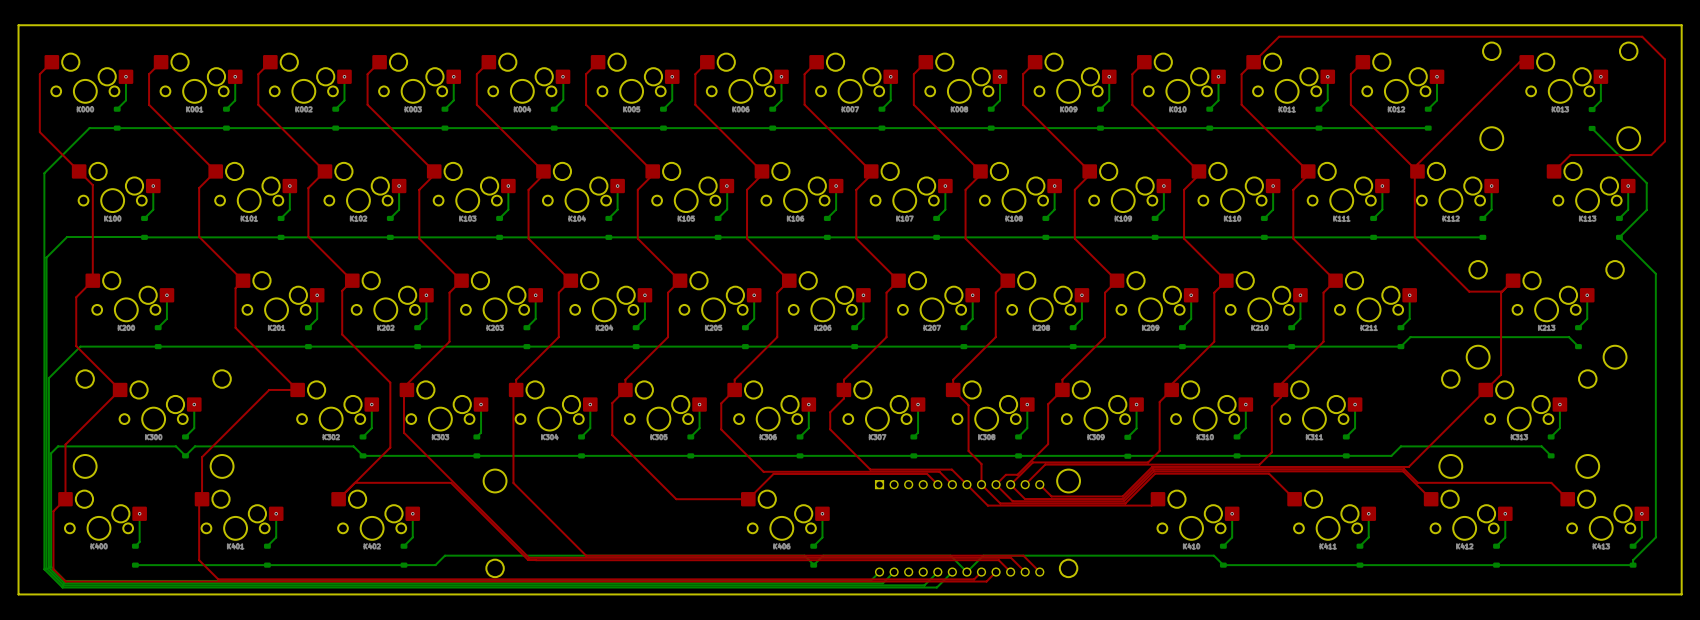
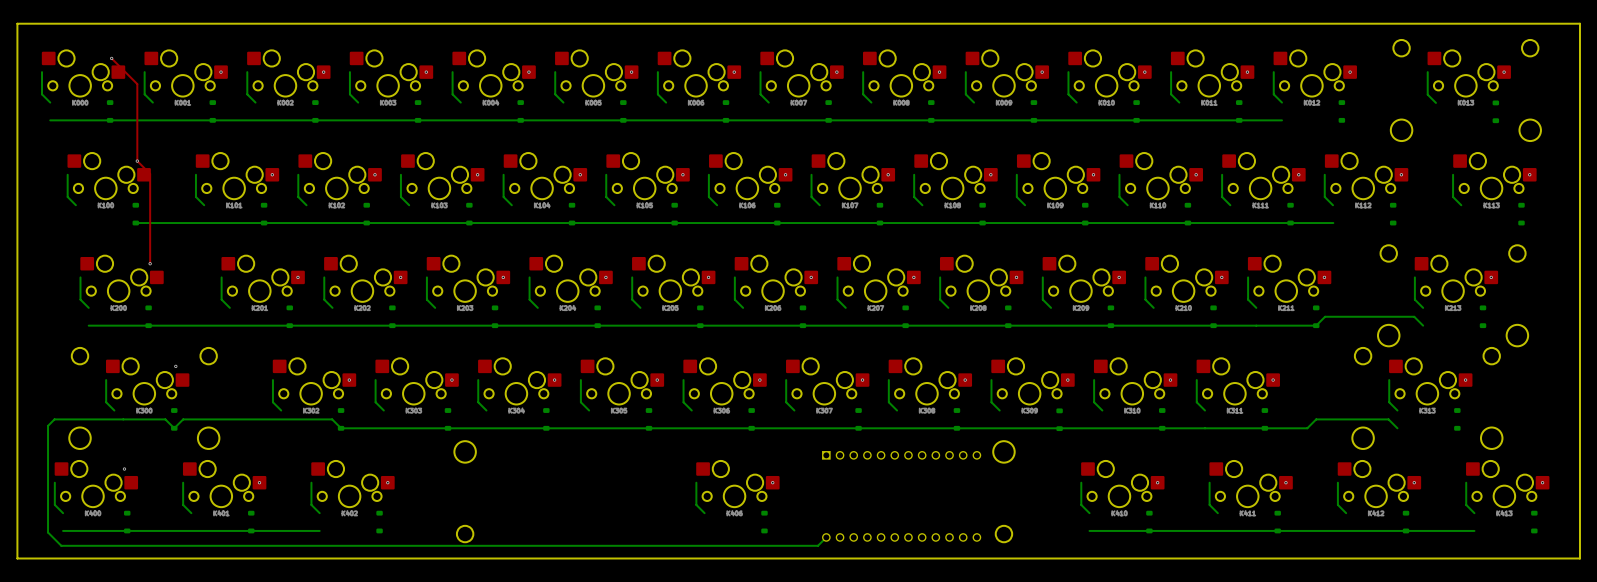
top track: (51, 62) (39, 74) (39, 132) (92, 185) (92, 280) (76, 297) (76, 346) (120, 389) (65, 444) (65, 499) (53, 511) (53, 569) (65, 581) (986, 581) (996, 572) -> none
top track: none -> (111, 58) (137, 84) (137, 161) (150, 173) (150, 263)
top track: (161, 62) (149, 74) (149, 104) (215, 171) (199, 188) (199, 236) (243, 280) (235, 288) (235, 327) (297, 389) (269, 389) (202, 457) (202, 499) -> none
top track: (270, 62) (258, 74) (258, 104) (324, 171) (308, 188) (308, 236) (352, 280) (342, 290) (342, 334) (390, 382) (390, 447) (338, 499) -> none
top track: (379, 62) (367, 74) (367, 104) (434, 171) -> none
top track: (488, 62) (476, 74) (476, 104) (543, 171) -> none
top track: (598, 62) (586, 74) (586, 104) (652, 171) -> none
top track: (707, 62) (695, 74) (695, 104) (761, 171) -> none
top track: (816, 62) (804, 74) (804, 104) (871, 171) -> none
top track: (925, 62) (913, 74) (913, 104) (980, 171) -> none
top track: (1035, 62) (1023, 74) (1023, 104) (1089, 171) -> none
top track: (1144, 62) (1132, 74) (1132, 104) (1198, 171) -> none
top track: (1362, 62) (1350, 74) (1350, 104) (1417, 171) (1417, 164) (1519, 62) (1526, 62) -> none
bottom track: none -> (42, 72) (42, 94) (50, 102)
bottom track: (125, 76) (125, 100) (117, 109) -> none
via position: (125, 76) -> (111, 58)
bottom track: none -> (144, 72) (144, 94) (152, 102)
bottom track: (235, 76) (235, 100) (226, 109) -> none
bottom track: none -> (247, 72) (247, 94) (255, 102)
bottom track: (344, 76) (344, 100) (335, 109) -> none
bottom track: none -> (349, 72) (349, 94) (358, 102)
bottom track: (453, 76) (453, 100) (444, 109) -> none
bottom track: none -> (452, 72) (452, 94) (460, 102)
bottom track: none -> (555, 72) (555, 94) (563, 102)
bottom track: (672, 76) (672, 100) (663, 109) -> none
bottom track: none -> (657, 72) (657, 94) (666, 102)
bottom track: (781, 76) (781, 100) (772, 109) -> none
bottom track: none -> (760, 72) (760, 94) (768, 102)
bottom track: (890, 76) (890, 100) (881, 109) -> none
bottom track: none -> (863, 72) (863, 94) (871, 102)
bottom track: (999, 76) (999, 100) (991, 109) -> none
bottom track: none -> (965, 72) (965, 94) (974, 102)
bottom track: (1109, 76) (1109, 100) (1100, 109) -> none
bottom track: none -> (1068, 72) (1068, 94) (1076, 102)
bottom track: (1218, 76) (1218, 100) (1209, 109) -> none
bottom track: none -> (1171, 72) (1171, 94) (1179, 102)
bottom track: (1327, 76) (1327, 100) (1318, 109) -> none
bottom track: none -> (1273, 72) (1273, 94) (1281, 102)
bottom track: (1437, 76) (1437, 100) (1428, 109) -> none
bottom track: none -> (1427, 72) (1427, 94) (1435, 102)
bottom track: (1600, 76) (1600, 100) (1592, 109) -> none
bottom track: (563, 77) (563, 100) (554, 109) -> none
bottom track: (89, 128) (44, 173) (44, 569) (62, 587) (936, 587) (952, 572) -> (84, 120) (50, 120)
bottom track: (1364, 128) (1428, 128) -> none
bottom track: (1592, 128) (1646, 183) (1646, 210) (1619, 237) (1655, 273) (1655, 537) (1633, 560) (1633, 565) (1569, 565) -> none
top track: (1308, 171) (1241, 104) (1241, 74) (1279, 36) (1642, 36) (1664, 59) (1664, 141) (1651, 155) (1570, 155) (1554, 171) -> none
top track: (435, 173) (419, 189) (419, 238) (463, 282) -> none
top track: (545, 173) (528, 189) (528, 238) (572, 282) -> none
top track: (654, 173) (637, 189) (637, 238) (681, 282) -> none
top track: (763, 173) (747, 189) (747, 238) (790, 282) -> none
top track: (872, 173) (856, 189) (856, 238) (900, 282) -> none
top track: (982, 173) (965, 189) (965, 238) (1009, 282) -> none
top track: (1091, 173) (1074, 189) (1074, 238) (1118, 282) -> none
top track: (1200, 173) (1184, 189) (1184, 238) (1227, 282) -> none
top track: (1309, 173) (1293, 189) (1293, 238) (1337, 282) -> none
top track: (1414, 174) (1414, 237) (1469, 291) (1502, 291) -> none
bottom track: none -> (67, 174) (67, 196) (75, 205)
bottom track: (153, 186) (153, 209) (144, 218) -> none
via position: (153, 186) -> (137, 161)
bottom track: none -> (195, 174) (195, 196) (204, 205)
bottom track: (289, 186) (289, 209) (281, 218) -> none
bottom track: none -> (298, 174) (298, 197) (306, 205)
bottom track: (399, 186) (399, 209) (390, 218) -> none
bottom track: none -> (400, 174) (400, 197) (409, 205)
bottom track: (508, 186) (508, 209) (499, 218) -> none
bottom track: none -> (503, 174) (503, 197) (511, 205)
bottom track: (617, 186) (617, 209) (608, 218) -> none
bottom track: none -> (606, 174) (606, 197) (614, 205)
bottom track: (727, 186) (727, 209) (718, 218) -> none
bottom track: none -> (708, 174) (708, 197) (717, 205)
bottom track: (836, 186) (836, 209) (827, 218) -> none
bottom track: none -> (811, 174) (811, 197) (819, 205)
bottom track: (945, 186) (945, 209) (936, 218) -> none
bottom track: none -> (914, 174) (914, 197) (922, 205)
bottom track: (1054, 186) (1054, 209) (1045, 218) -> none
bottom track: none -> (1016, 174) (1016, 197) (1025, 205)
bottom track: (1163, 186) (1163, 209) (1155, 218) -> none
bottom track: none -> (1119, 174) (1119, 197) (1127, 205)
bottom track: (1273, 186) (1273, 209) (1264, 218) -> none
bottom track: none -> (1222, 174) (1222, 197) (1230, 205)
bottom track: (1382, 186) (1382, 209) (1373, 218) -> none
bottom track: none -> (1324, 174) (1324, 197) (1333, 205)
bottom track: (1491, 186) (1491, 209) (1482, 218) -> none
bottom track: none -> (1453, 174) (1453, 197) (1461, 205)
bottom track: (1628, 186) (1628, 209) (1619, 218) -> none
bottom track: (144, 237) (67, 237) (46, 257) (46, 568) (63, 585) (924, 585) (937, 572) -> none
bottom track: (1419, 237) (1482, 237) -> none
top track: (461, 280) (449, 292) (449, 341) (406, 384) -> none
top track: (570, 280) (558, 292) (558, 337) (516, 379) (516, 389) -> none
top track: (680, 280) (668, 292) (668, 337) (625, 379) (625, 389) (612, 403) (612, 435) (676, 499) (748, 499) (773, 473) (927, 473) (937, 484) -> none
top track: (789, 280) (777, 292) (777, 337) (734, 379) (734, 389) (721, 403) (721, 429) (763, 471) (939, 471) (952, 484) -> none
top track: (898, 280) (886, 292) (886, 337) (843, 379) (843, 398) (830, 412) (830, 429) (870, 469) (951, 469) (987, 505) (1151, 505) (1158, 499) -> none
top track: (1007, 280) (995, 292) (995, 337) (953, 379) (953, 389) (968, 405) (968, 451) (981, 464) (981, 484) (1000, 503) (1125, 503) (1155, 473) (1269, 473) (1294, 499) -> none
top track: (1117, 280) (1105, 292) (1105, 337) (1062, 379) (1062, 389) (1048, 404) (1048, 444) (1017, 474) (1005, 474) (996, 484) (1012, 501) (1124, 501) (1153, 471) (1403, 471) (1431, 499) -> none
top track: (1226, 280) (1214, 292) (1214, 341) (1171, 384) -> none
top track: (1335, 280) (1323, 292) (1323, 341) (1280, 384) -> none
top track: (1513, 280) (1501, 292) (1501, 374) (1408, 466) (1152, 466) (1122, 496) (1051, 496) (1039, 484) -> none
bottom track: none -> (80, 277) (80, 299) (88, 307)
bottom track: (166, 295) (166, 318) (158, 327) -> none
via position: (166, 295) -> (150, 263)
bottom track: none -> (221, 277) (221, 299) (229, 307)
bottom track: (317, 295) (317, 318) (308, 327) -> none
bottom track: none -> (324, 277) (324, 299) (332, 307)
bottom track: (426, 295) (426, 318) (417, 327) -> none
bottom track: none -> (426, 277) (426, 299) (435, 307)
bottom track: (535, 295) (535, 318) (526, 327) -> none
bottom track: none -> (529, 277) (529, 299) (537, 307)
bottom track: (644, 295) (644, 318) (636, 327) -> none
bottom track: none -> (632, 277) (632, 299) (640, 307)
bottom track: (754, 295) (754, 318) (745, 327) -> none
bottom track: none -> (734, 277) (734, 299) (743, 307)
bottom track: (863, 295) (863, 318) (854, 327) -> none
bottom track: none -> (837, 277) (837, 299) (845, 307)
bottom track: (972, 295) (972, 318) (963, 327) -> none
bottom track: none -> (940, 277) (940, 299) (948, 307)
bottom track: (1081, 295) (1081, 318) (1073, 327) -> none
bottom track: none -> (1042, 277) (1042, 299) (1051, 307)
bottom track: (1191, 295) (1191, 318) (1182, 327) -> none
bottom track: none -> (1145, 277) (1145, 299) (1153, 307)
bottom track: (1300, 295) (1300, 318) (1291, 327) -> none
bottom track: none -> (1248, 277) (1248, 299) (1256, 307)
bottom track: (1409, 295) (1409, 318) (1400, 327) -> none
bottom track: none -> (1414, 277) (1414, 299) (1423, 307)
bottom track: (1587, 295) (1587, 318) (1578, 327) -> none
bottom track: (1505, 337) (1569, 337) (1578, 346) -> (1414, 316) (1423, 325)
bottom track: (94, 346) (80, 346) (48, 378) (48, 567) (64, 583) (883, 583) (894, 572) -> none
top track: (1171, 389) (1159, 401) (1159, 450) (1148, 462) (1032, 462) (1010, 484) -> none
top track: (1280, 389) (1280, 397) (1271, 406) (1271, 452) (1259, 464) (1045, 464) (1025, 484) -> none
top track: (403, 392) (403, 432) (529, 557) (1011, 557) (1025, 572) -> none
top track: (513, 392) (513, 483) (586, 555) (1023, 555) (1039, 572) -> none
bottom track: none -> (106, 380) (106, 402) (114, 410)
bottom track: (194, 404) (194, 428) (185, 436) -> none
via position: (194, 404) -> (175, 366)
bottom track: none -> (272, 380) (272, 402) (281, 410)
bottom track: (371, 404) (371, 428) (363, 436) -> none
bottom track: none -> (375, 380) (375, 402) (383, 410)
bottom track: (481, 404) (481, 432) (476, 436) -> none
bottom track: none -> (478, 380) (478, 402) (486, 410)
bottom track: (590, 404) (590, 428) (581, 436) -> none
bottom track: none -> (580, 380) (580, 402) (589, 410)
bottom track: (699, 404) (699, 428) (690, 436) -> none
bottom track: none -> (683, 380) (683, 402) (691, 410)
bottom track: (808, 404) (808, 428) (800, 436) -> none
bottom track: none -> (786, 380) (786, 402) (794, 410)
bottom track: (918, 404) (918, 432) (913, 436) -> none
bottom track: none -> (888, 380) (888, 402) (897, 410)
bottom track: (1027, 404) (1027, 428) (1018, 436) -> none
bottom track: none -> (991, 380) (991, 402) (999, 410)
bottom track: (1136, 404) (1136, 428) (1127, 437) -> none
bottom track: none -> (1094, 380) (1094, 402) (1102, 410)
bottom track: (1245, 404) (1245, 428) (1237, 436) -> none
bottom track: none -> (1196, 380) (1196, 402) (1205, 410)
bottom track: (1355, 404) (1355, 428) (1346, 436) -> none
bottom track: none -> (1389, 380) (1389, 402) (1397, 410)
bottom track: (1559, 404) (1559, 428) (1551, 436) -> none
bottom track: (1477, 446) (1541, 446) (1551, 455) -> (1388, 419) (1397, 428)
top track: (355, 482) (450, 482) (528, 560) (998, 560) (1010, 572) -> none
top track: (1010, 484) (1025, 499) (1123, 499) (1153, 469) (1404, 469) (1417, 482) (1551, 482) (1567, 499) -> none
top track: (199, 502) (199, 560) (218, 579) (974, 579) (981, 572) -> none
bottom track: none -> (54, 482) (54, 504) (63, 513)
bottom track: (139, 513) (139, 541) (135, 546) -> none
via position: (139, 513) -> (124, 469)
bottom track: none -> (183, 482) (183, 504) (191, 513)
bottom track: (276, 513) (276, 537) (267, 546) -> none
bottom track: none -> (311, 482) (311, 504) (319, 513)
bottom track: (412, 513) (412, 537) (403, 546) -> none
bottom track: none -> (696, 482) (696, 504) (704, 513)
bottom track: (822, 513) (822, 537) (813, 546) -> none
bottom track: none -> (1081, 482) (1081, 504) (1089, 513)
bottom track: (1232, 513) (1232, 537) (1223, 546) -> none
bottom track: none -> (1209, 482) (1209, 504) (1217, 513)
bottom track: (1368, 513) (1368, 537) (1359, 546) -> none
bottom track: none -> (1337, 482) (1337, 504) (1346, 513)
bottom track: (1505, 513) (1505, 537) (1496, 546) -> none
bottom track: none -> (1466, 482) (1466, 504) (1474, 513)
bottom track: (1641, 513) (1641, 537) (1633, 546) -> none
bottom track: (813, 564) (804, 555) (444, 555) (435, 565) (340, 565) -> none
bottom track: none -> (63, 530) (127, 530)
bottom track: (813, 565) (823, 555) (950, 555) (966, 572) (983, 555) (1213, 555) (1223, 565) -> (1089, 530) (1149, 530)

